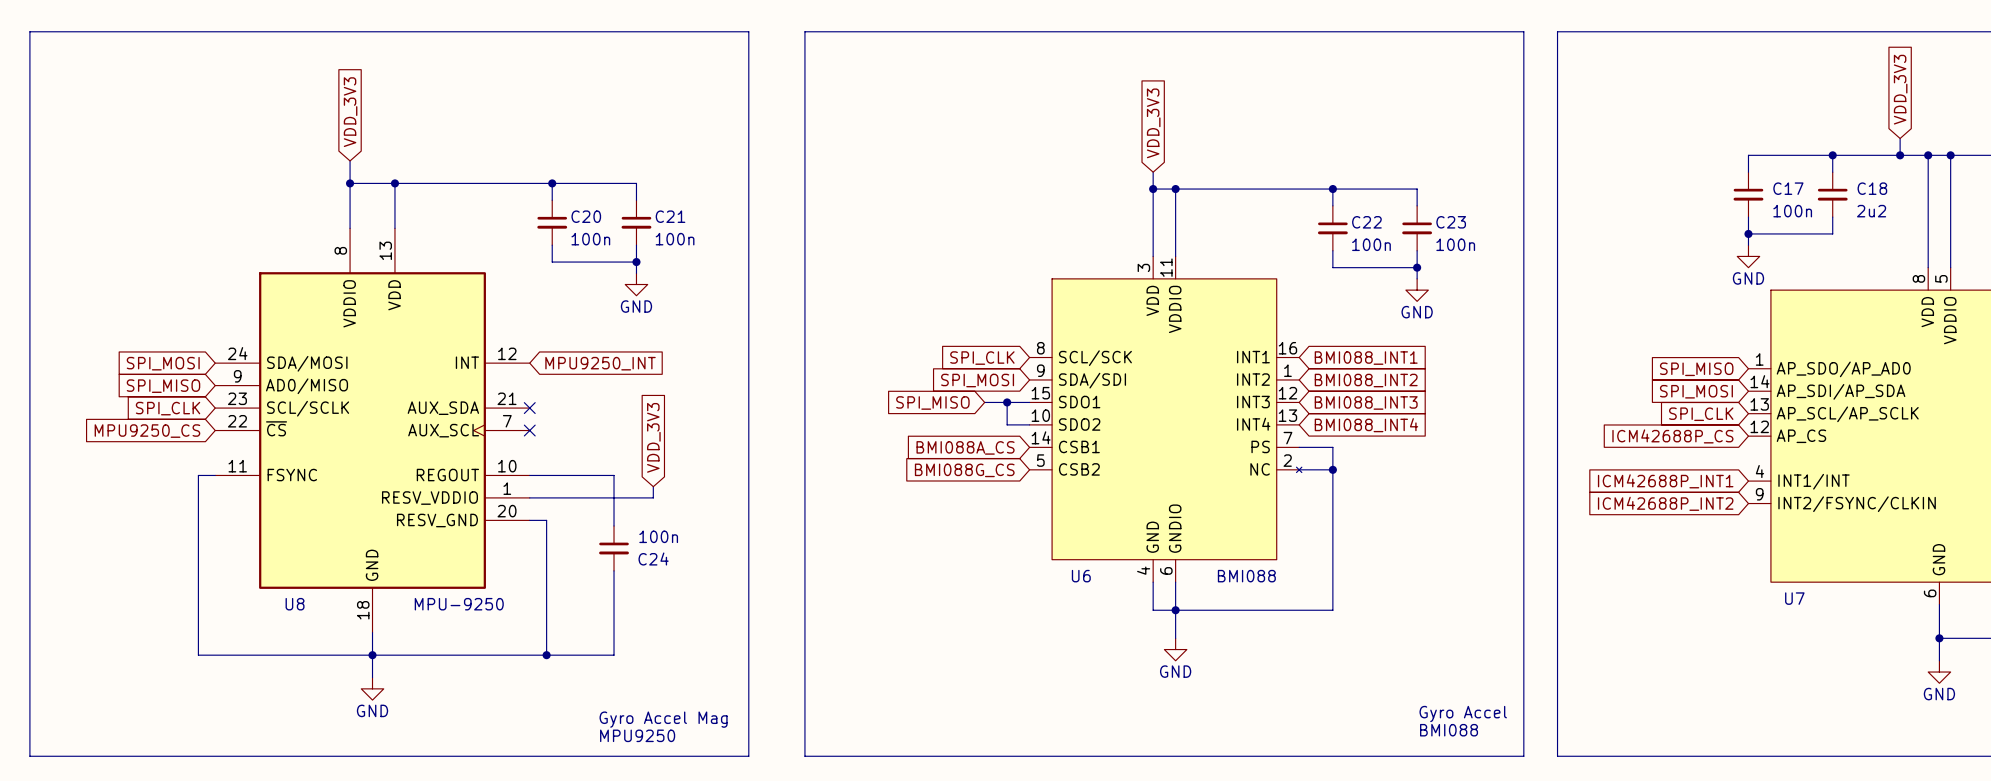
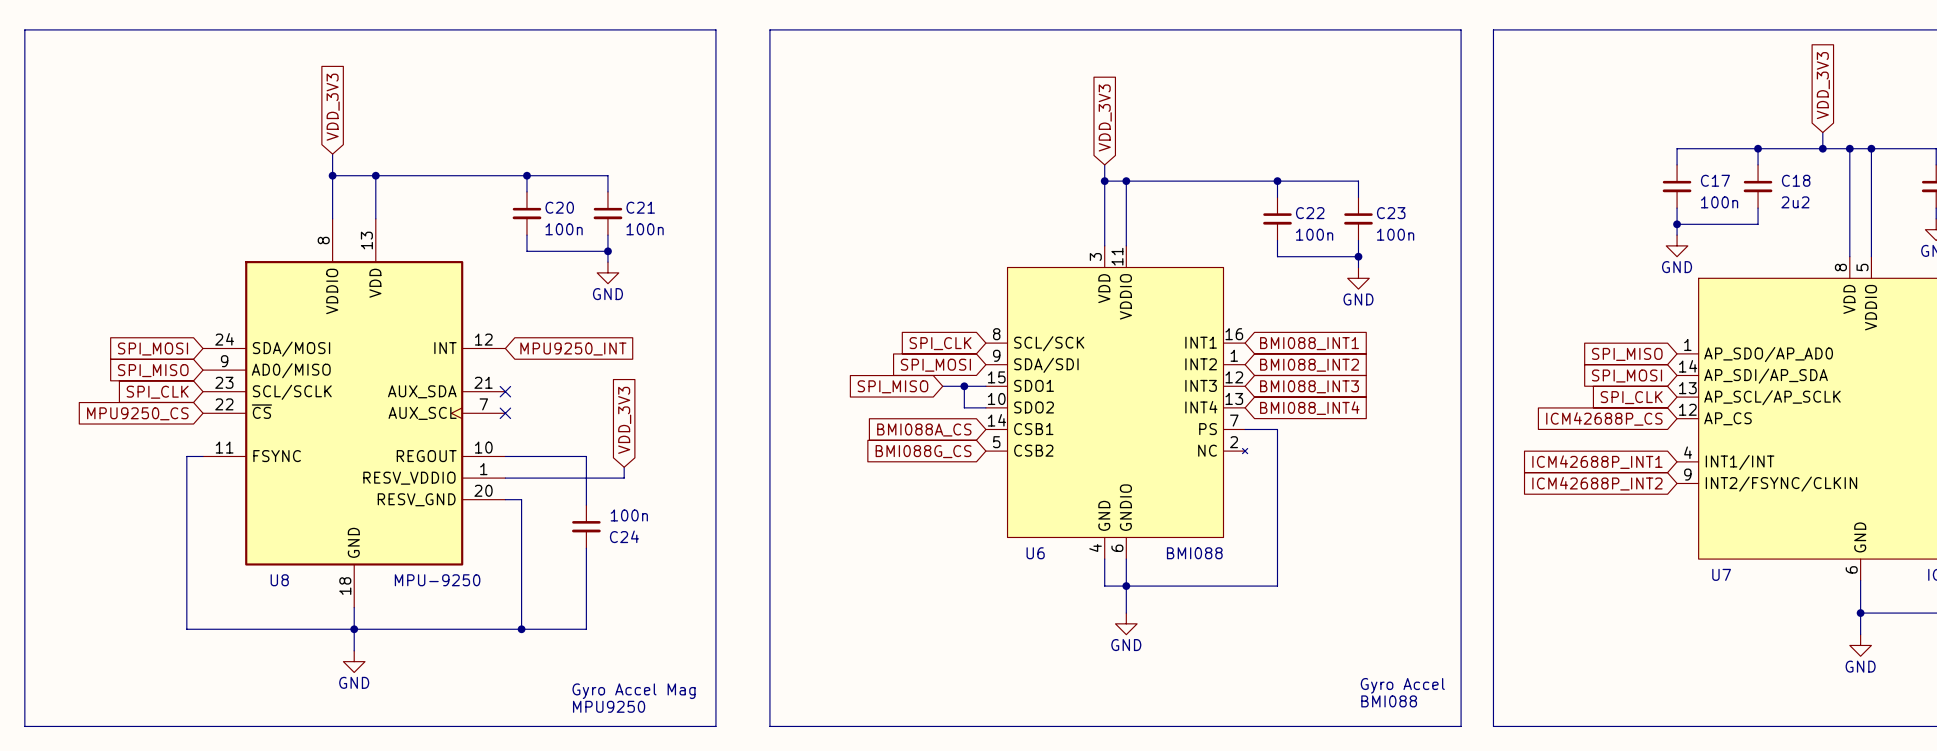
wire: (1299, 469) (1332, 469) -> none
junction: (1332, 469) -> none

